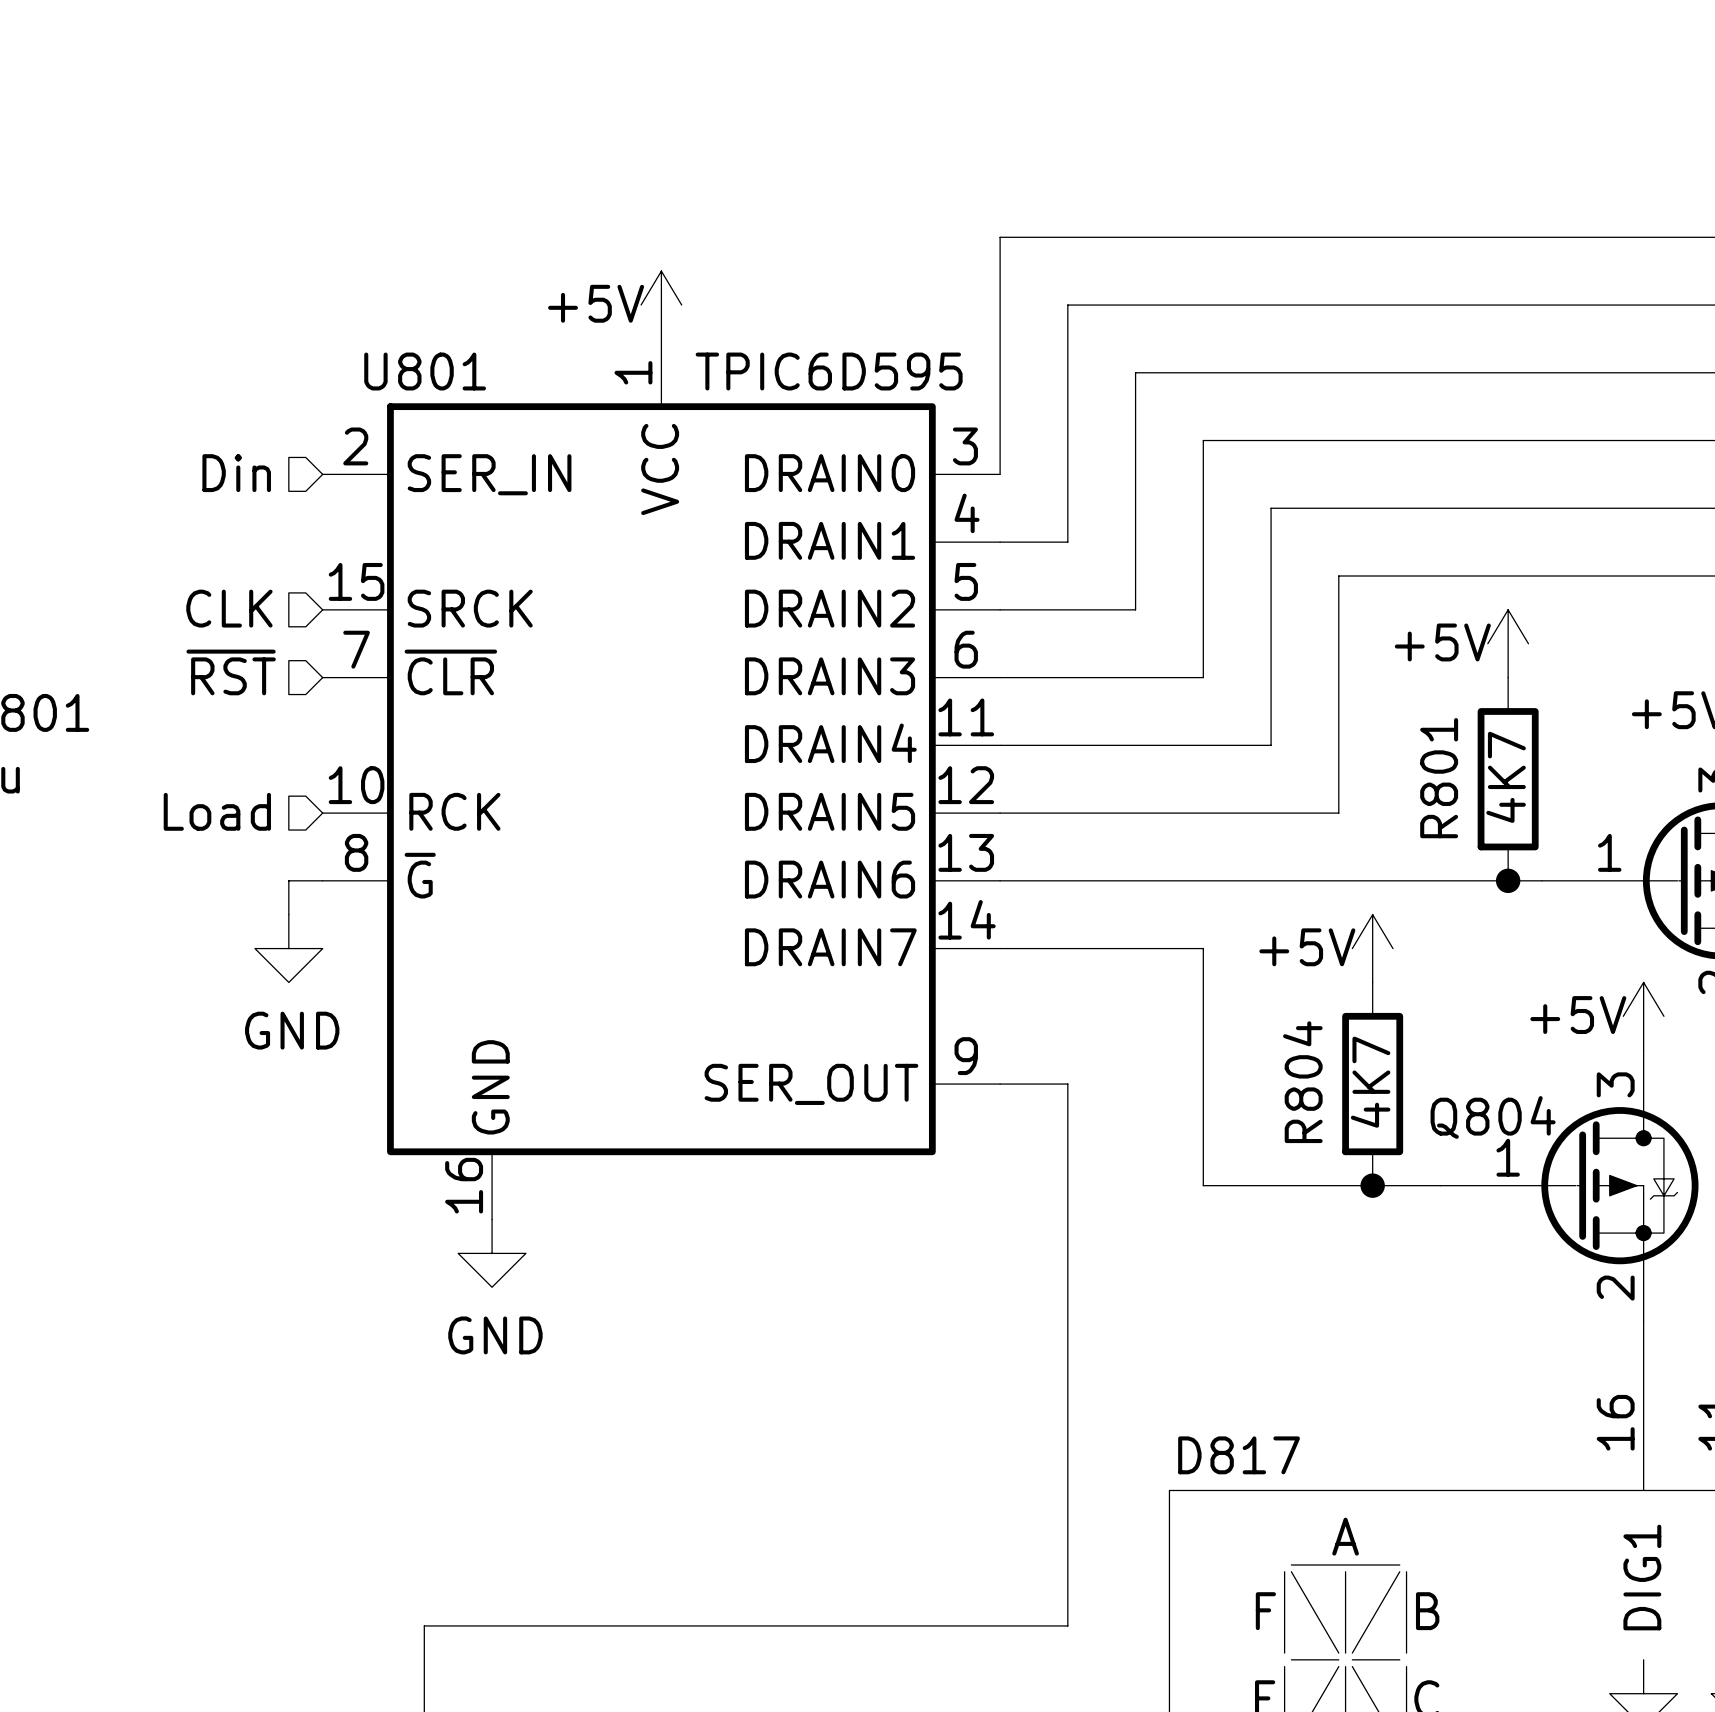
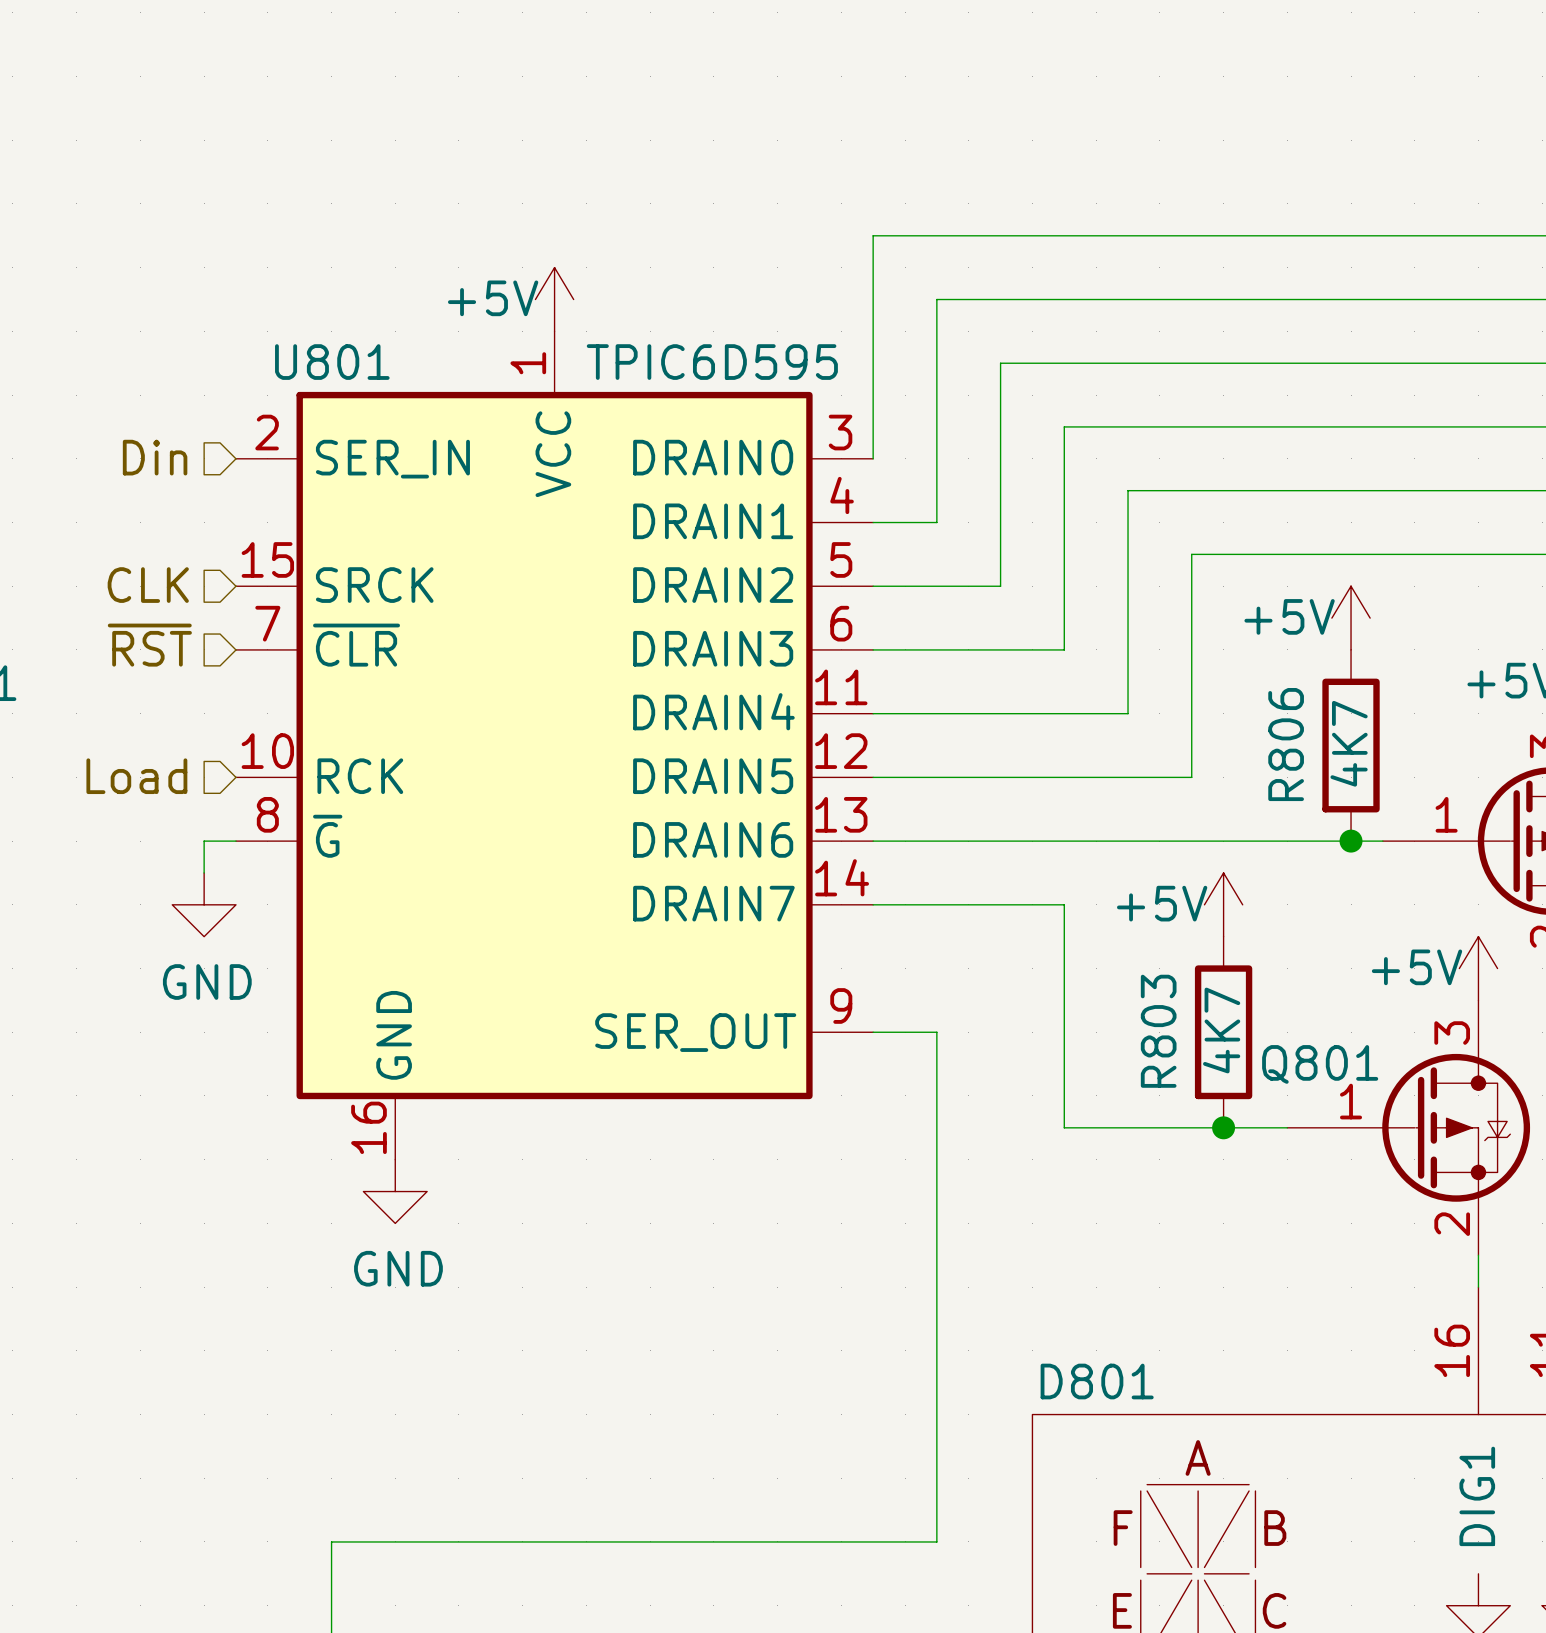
R801 name: R801 (1439, 778) -> R806 (1286, 744)
R804 name: R804 (1302, 1082) -> R803 (1158, 1031)
Q804 name: Q804 (1493, 1117) -> Q801 (1320, 1064)
D817 name: D817 (1239, 1455) -> D801 (1097, 1381)

